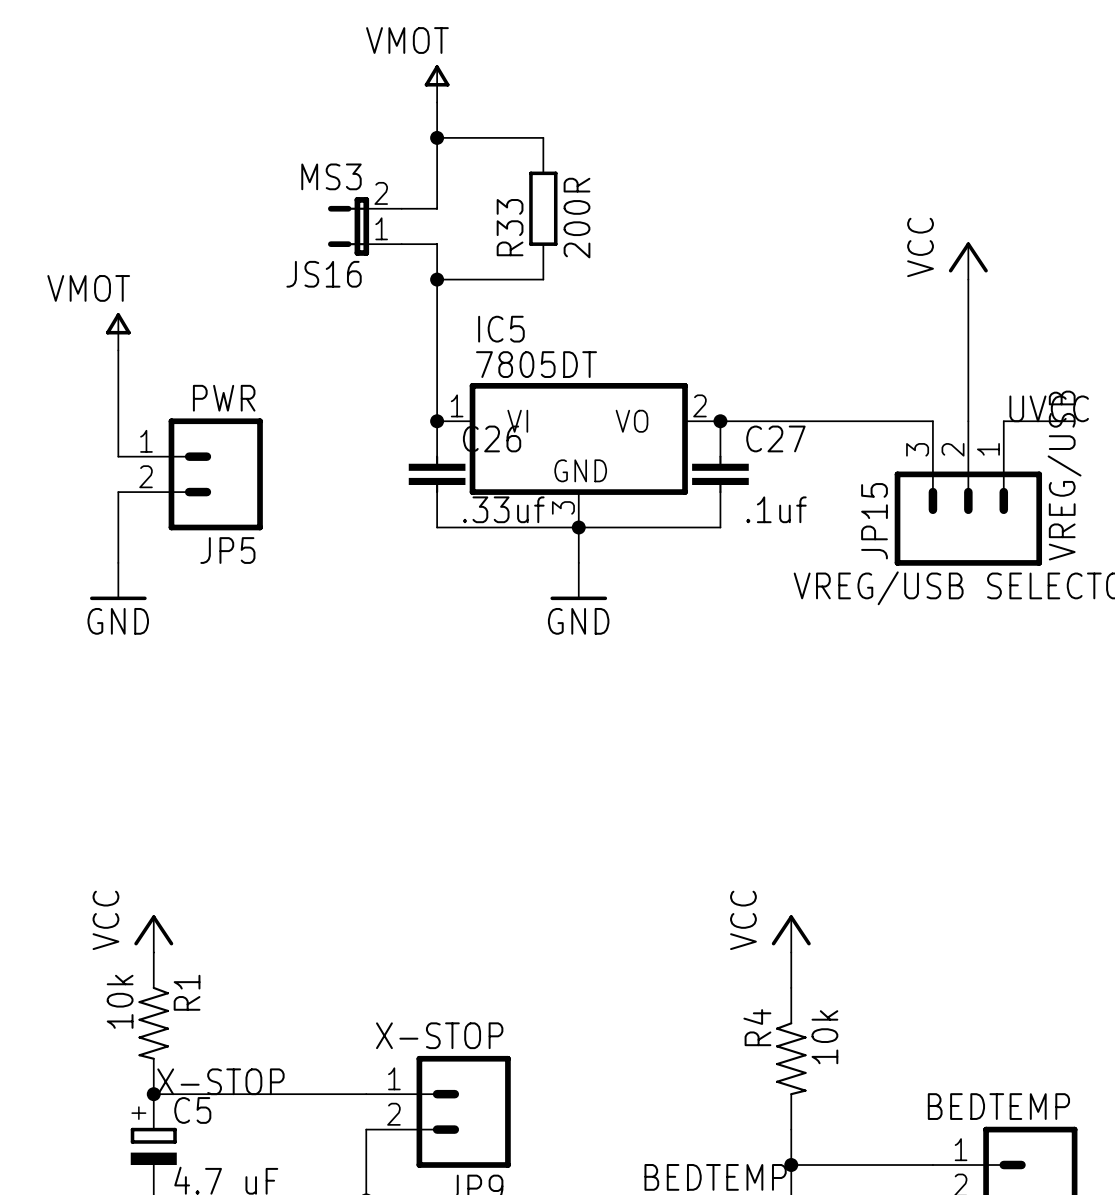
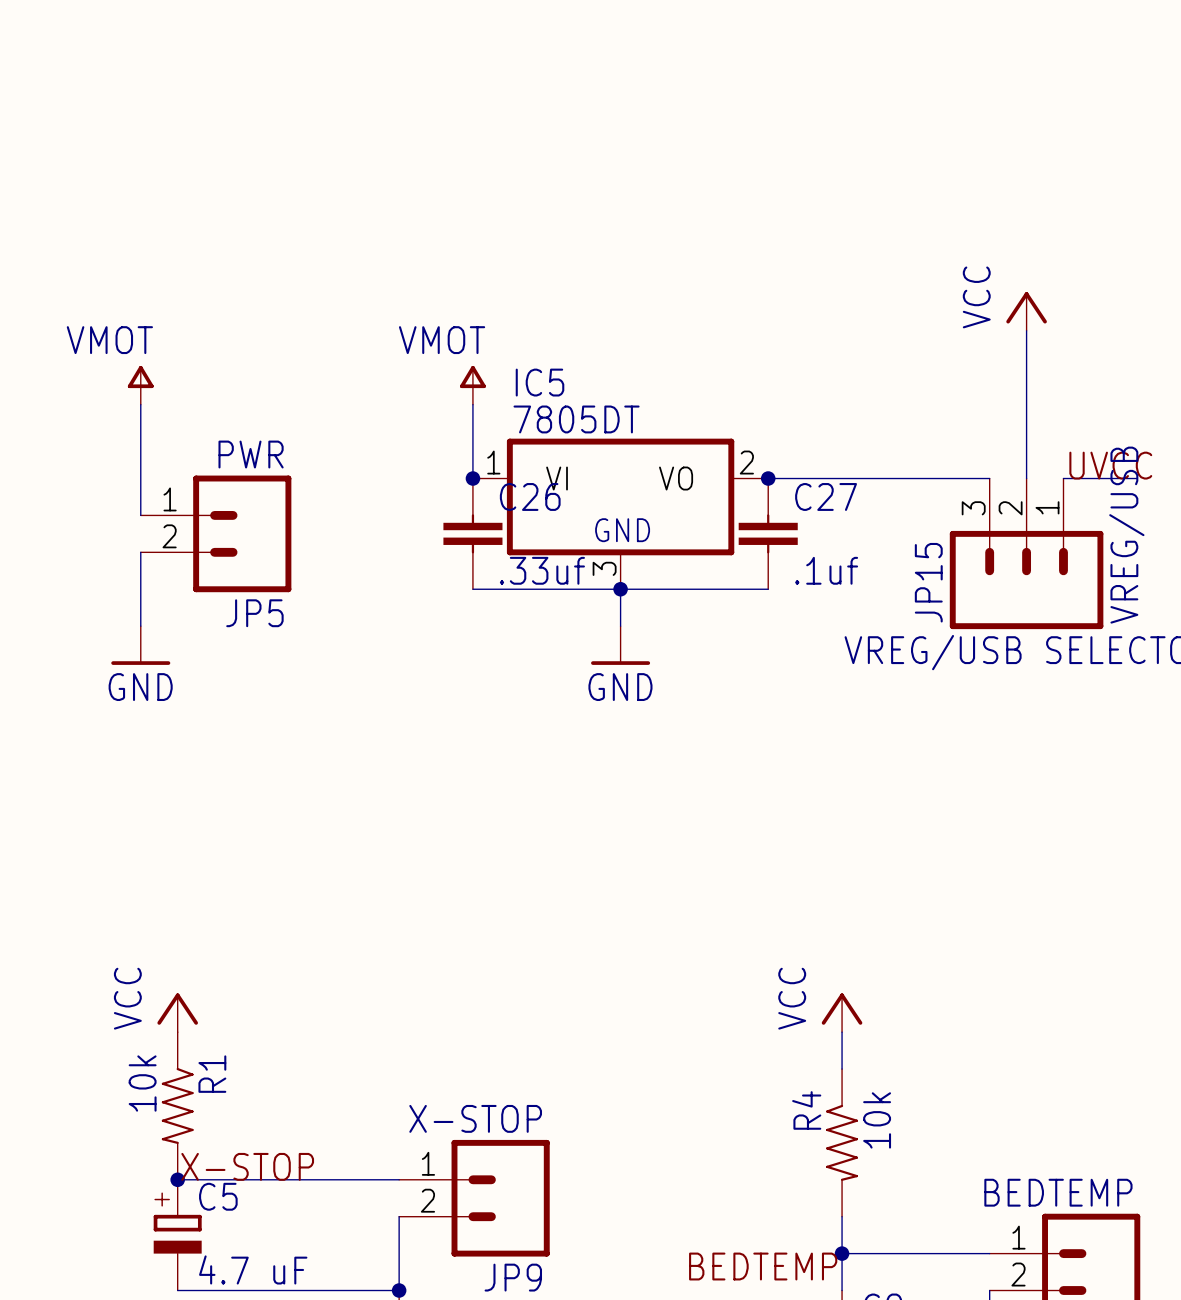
power symbol position: VMOT (437, 83) -> VMOT (472, 385)
wire: (437, 102) (437, 208) (401, 208) -> none
wire: (437, 137) (543, 137) -> none
junction: (437, 137) -> none
R33: 200R (543, 208) -> none
JS16: MS3 (364, 226) -> none
wire: (401, 244) (437, 244) (437, 350) -> none
wire: (437, 279) (543, 279) -> none
junction: (437, 279) -> none

